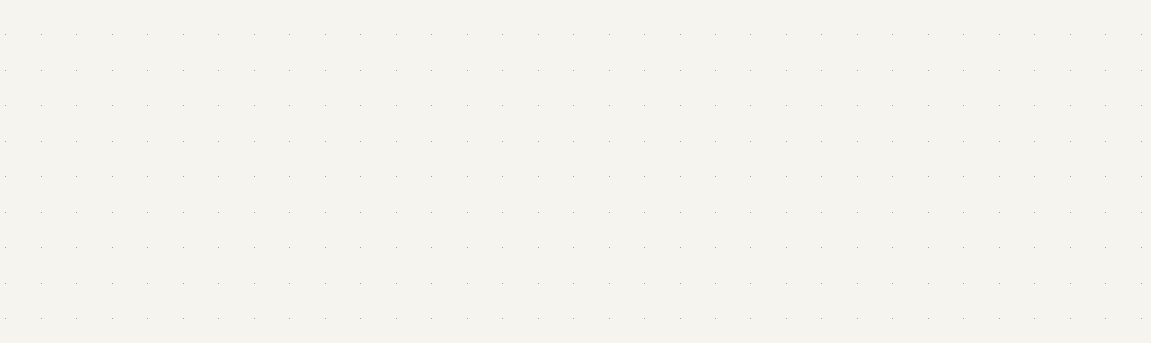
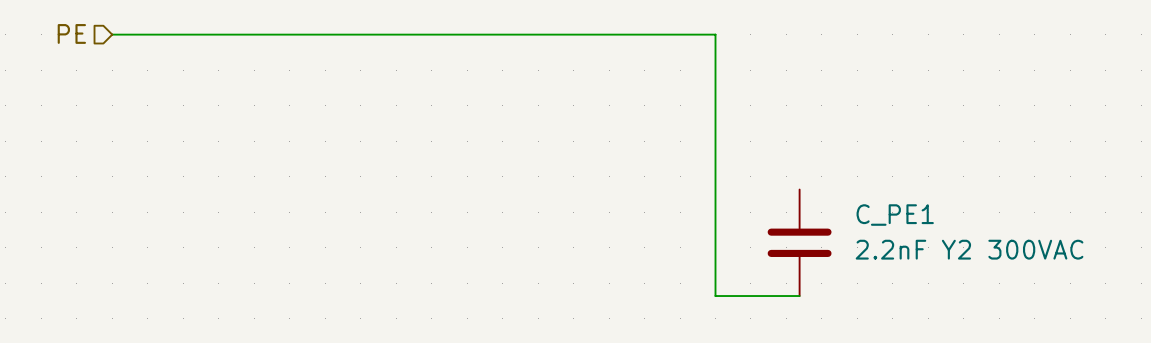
hierarchical label: none -> PE (71, 33)
wire: none -> (112, 34) (715, 34) (715, 296) (799, 296)
C_PE1: none -> 2.2nF Y2 300VAC (799, 242)

